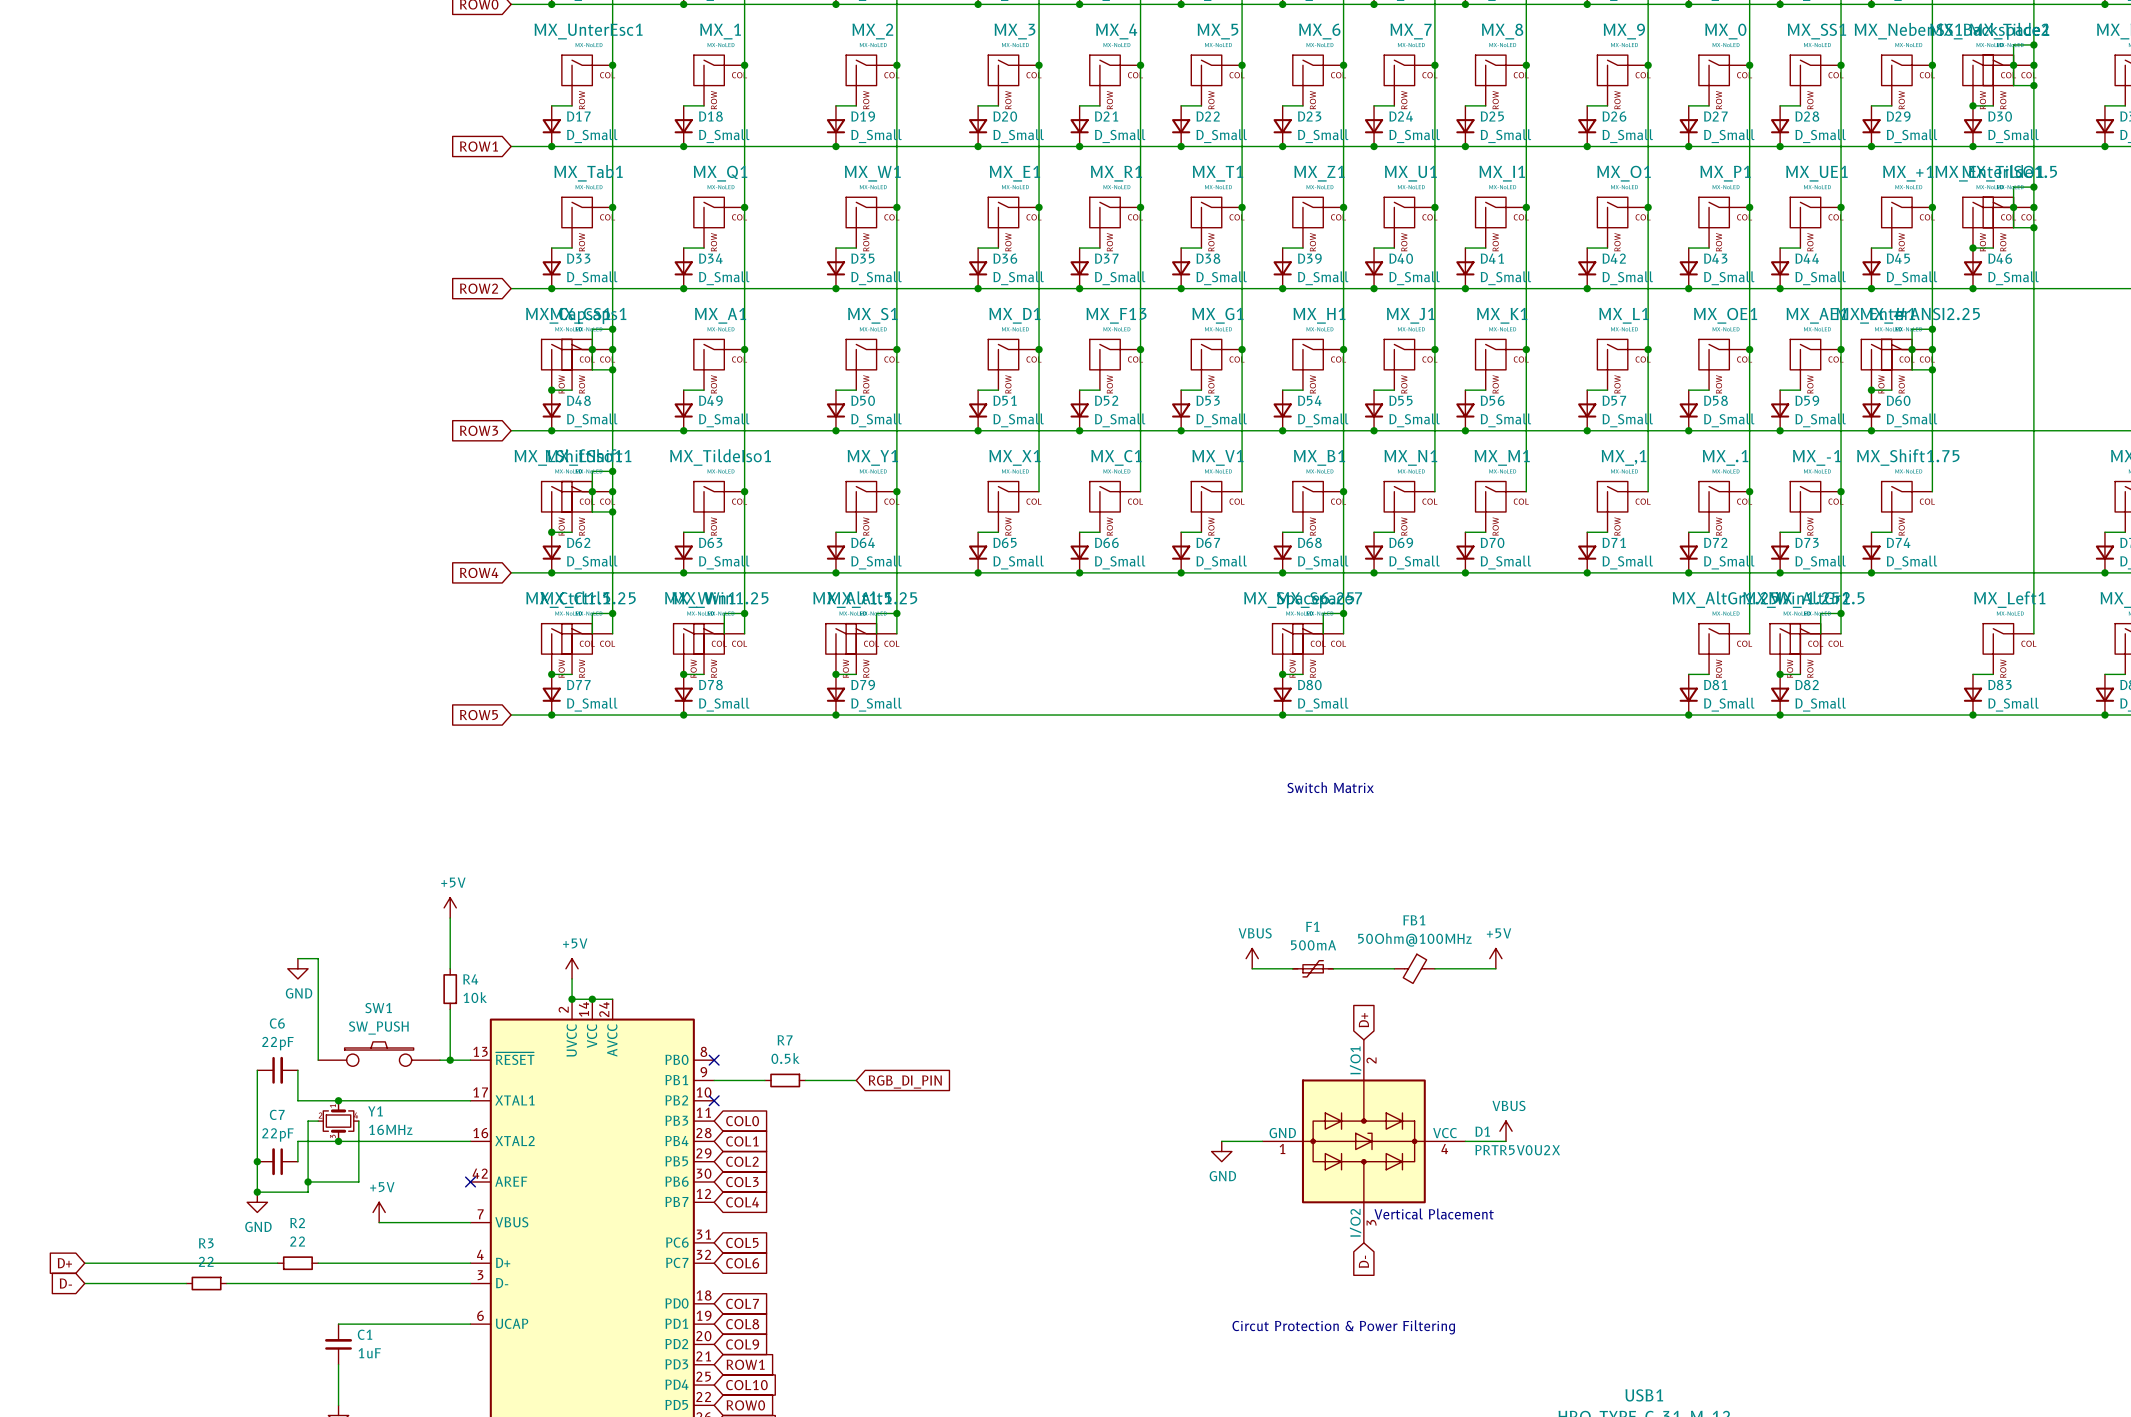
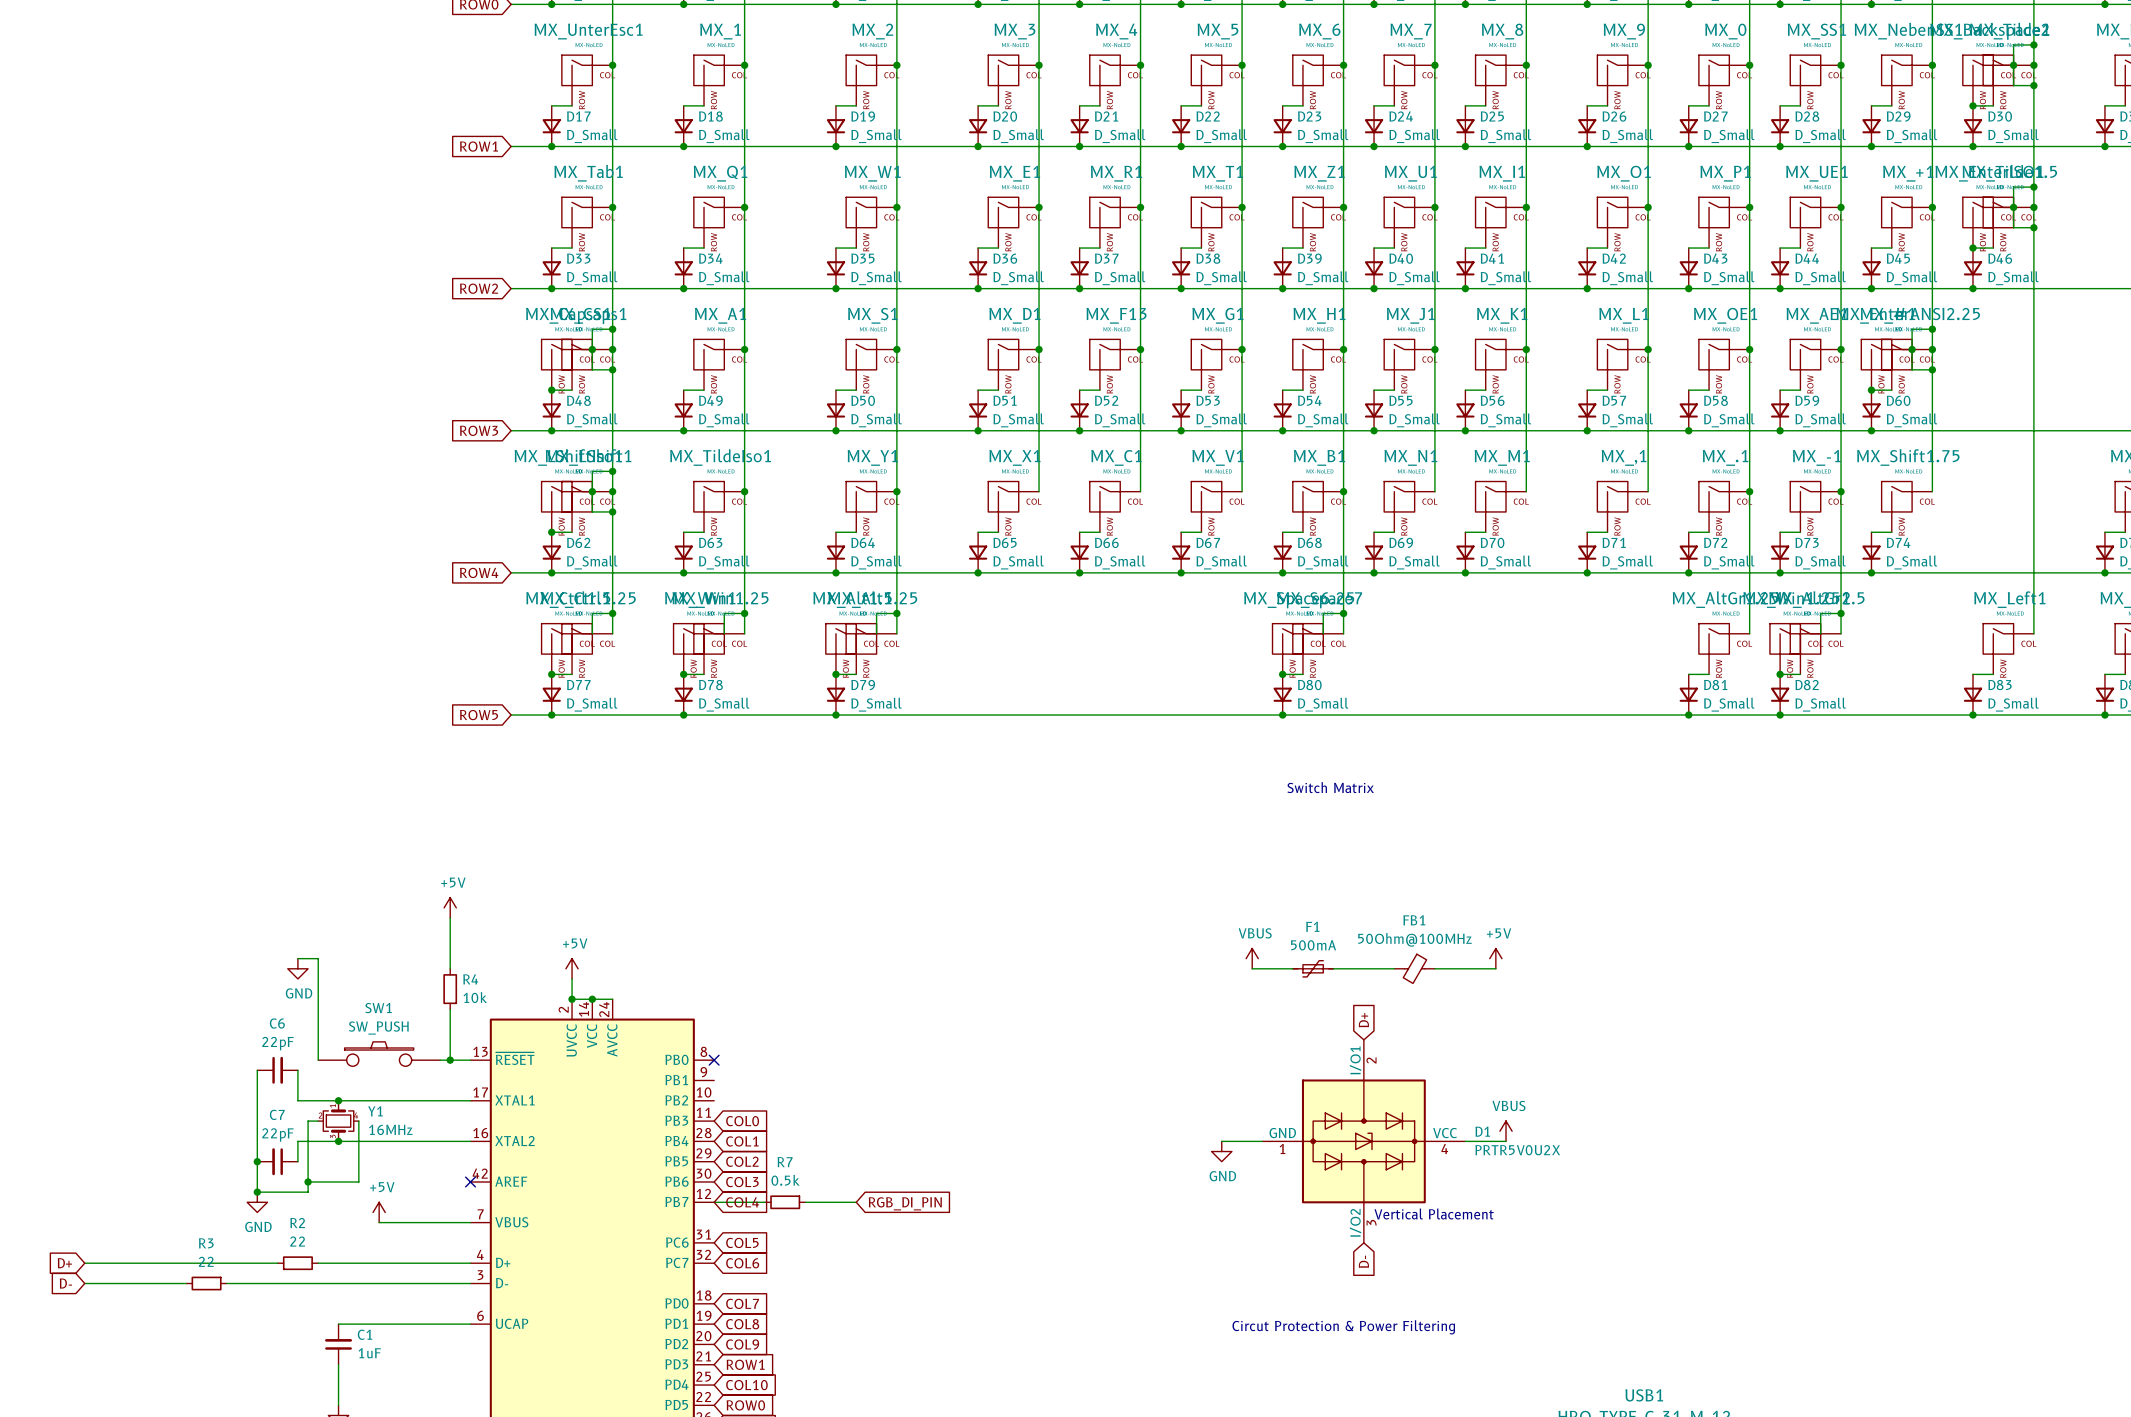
wire: (714, 1080) (764, 1080) -> (714, 1202) (764, 1202)
R7 position: (785, 1080) -> (785, 1202)
wire: (805, 1080) (856, 1080) -> (805, 1202) (856, 1202)
global label position: RGB_DI_PIN (905, 1081) -> RGB_DI_PIN (905, 1203)
no-connect mark: (714, 1100) -> none

